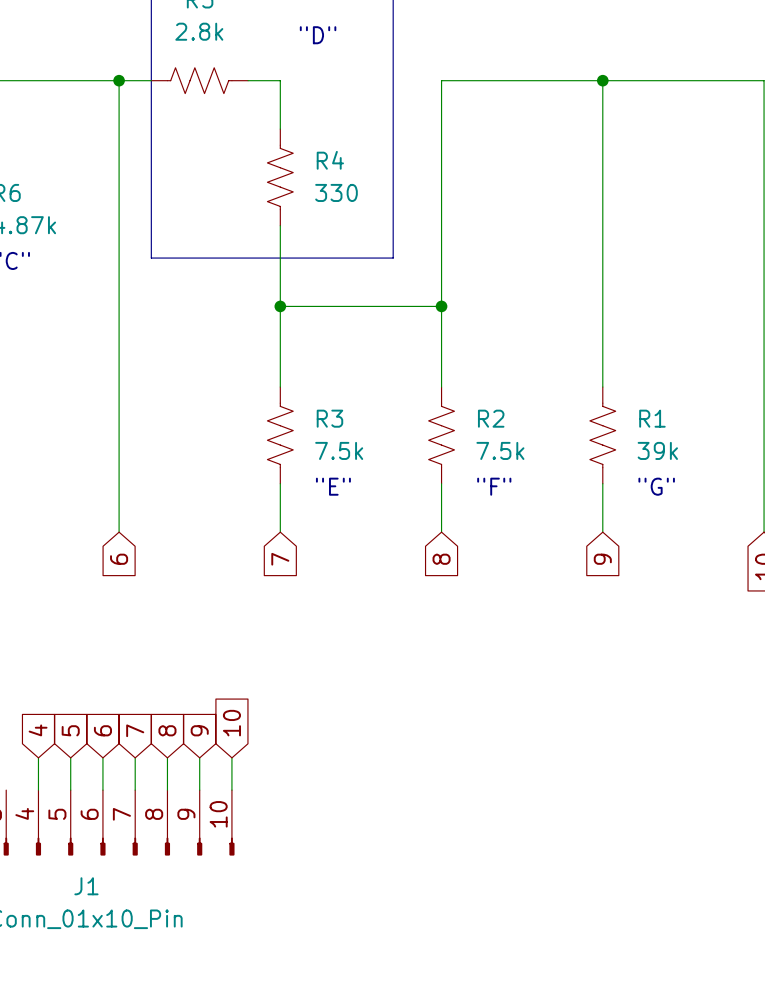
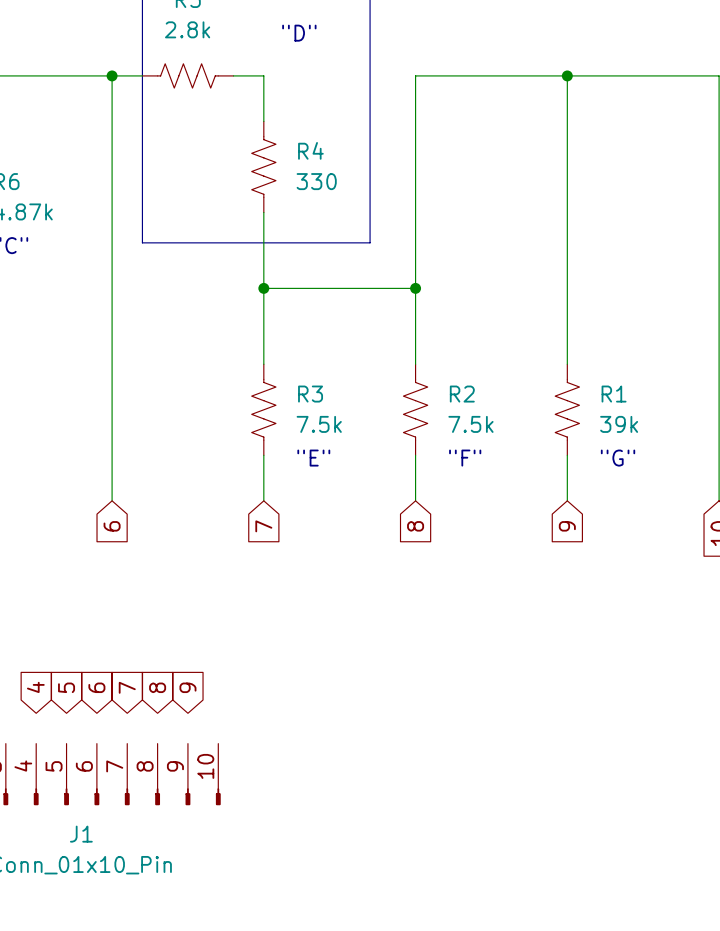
global label: 10 (231, 723) -> none
wire: (38, 757) (38, 790) -> none
wire: (70, 757) (70, 790) -> none
wire: (102, 757) (102, 790) -> none
wire: (135, 757) (135, 790) -> none
wire: (167, 757) (167, 790) -> none
wire: (199, 757) (199, 790) -> none
wire: (231, 757) (231, 790) -> none

